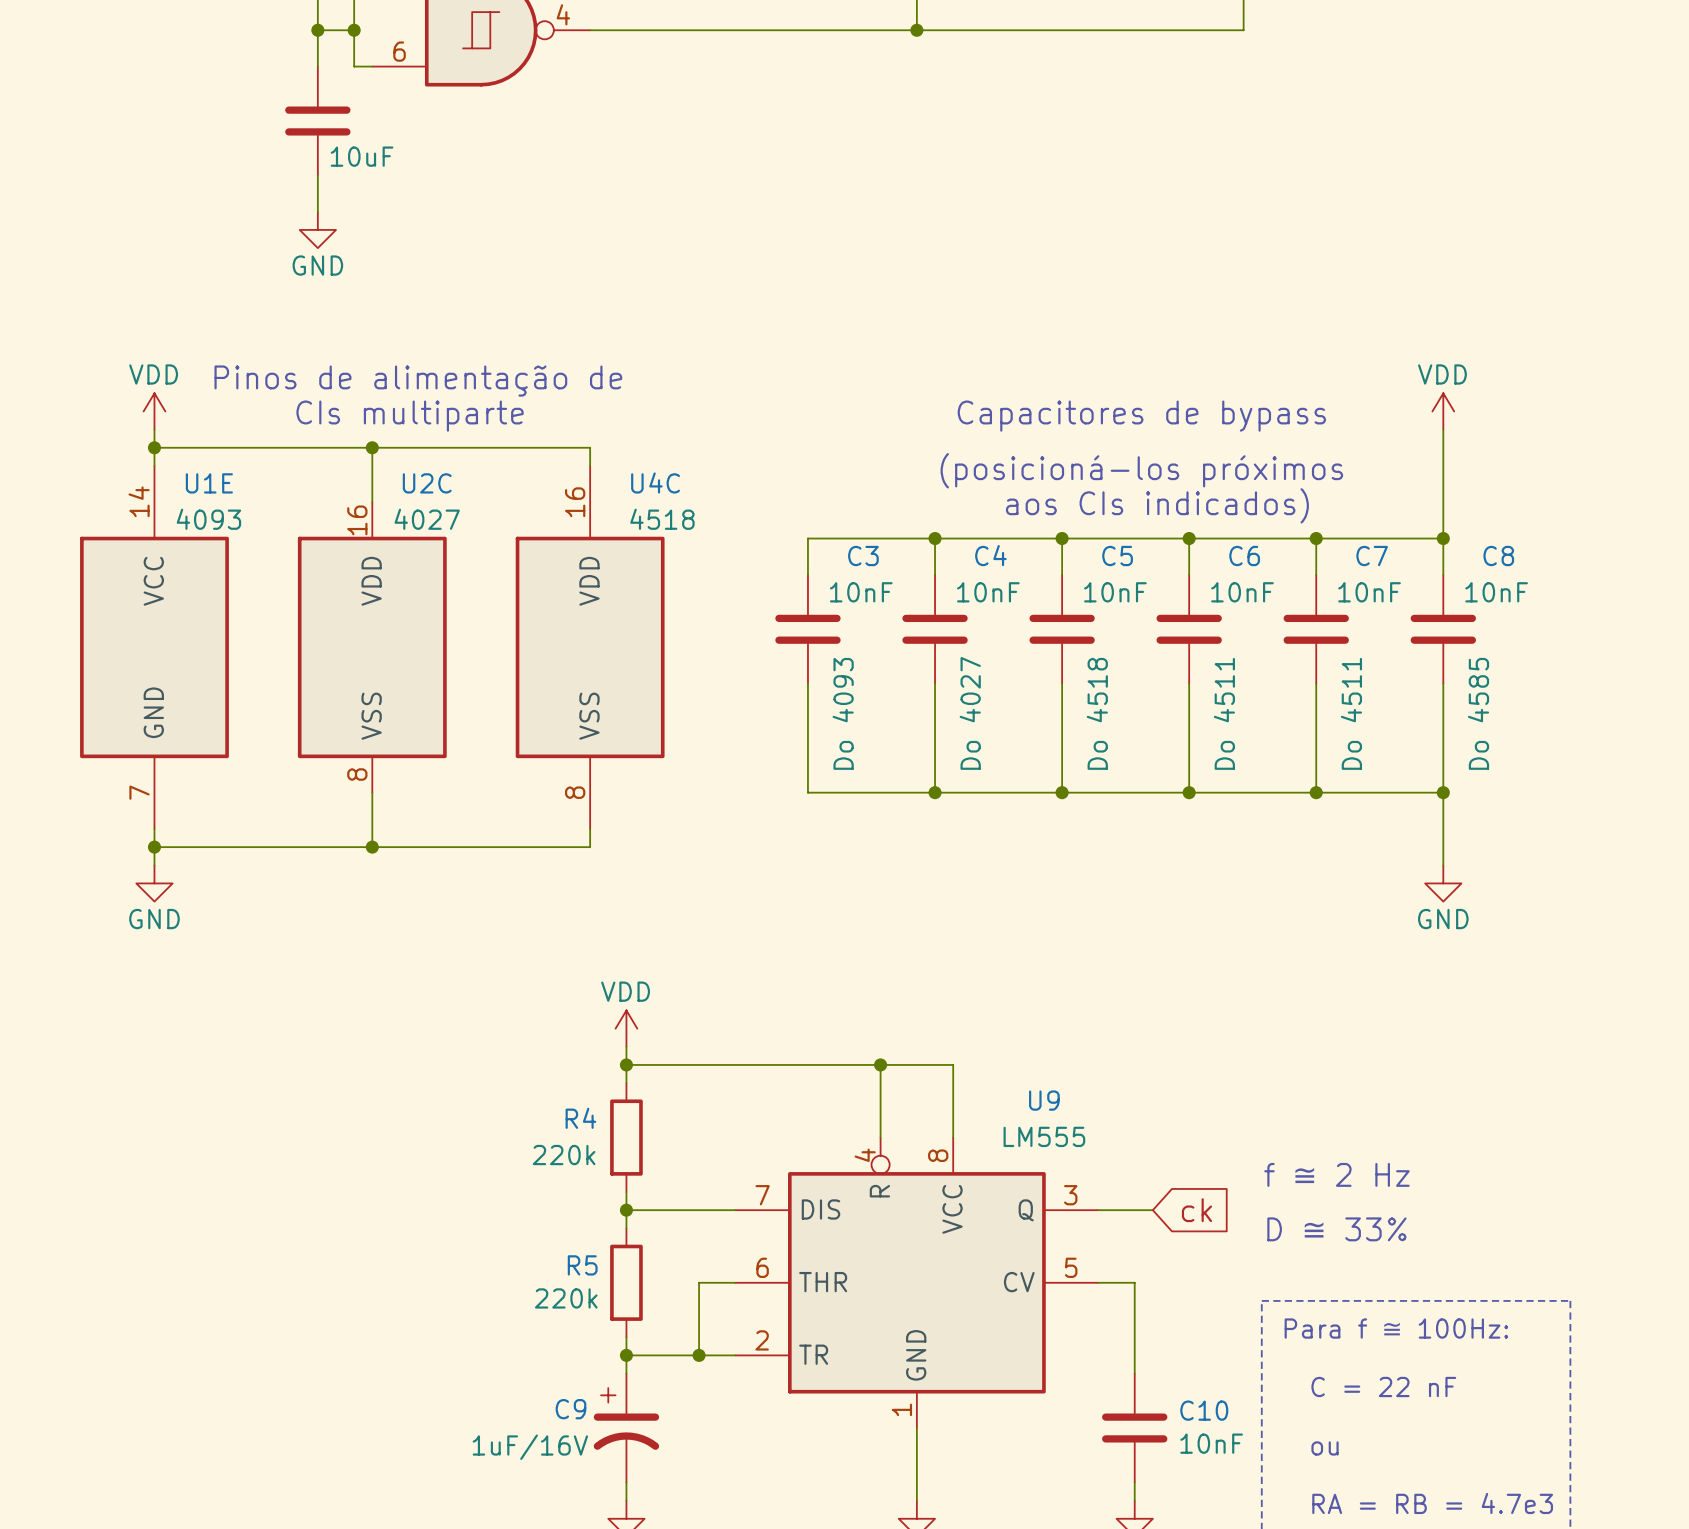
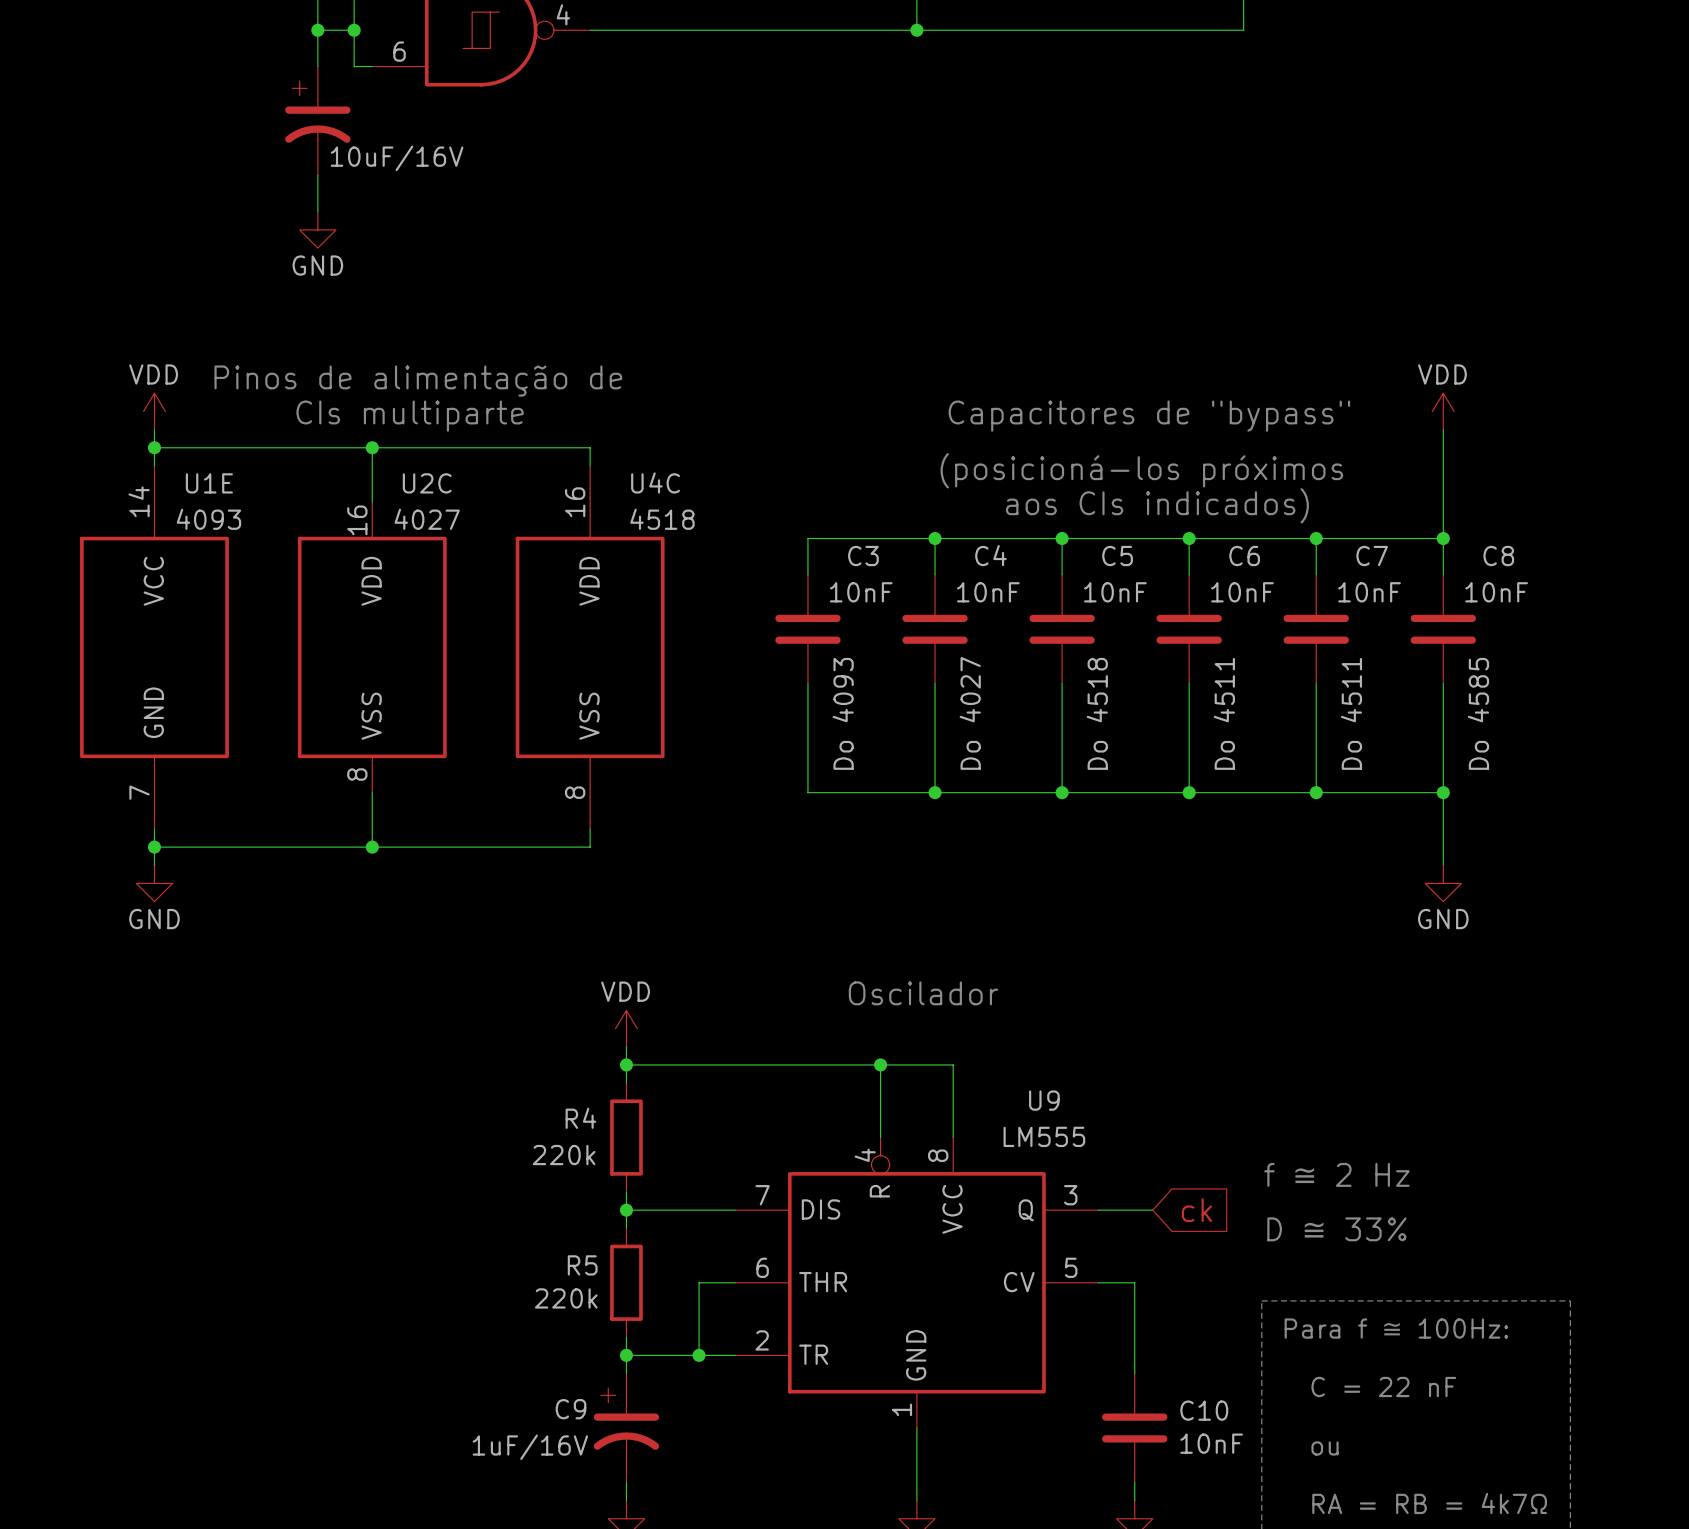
part symbol: [285, 66, 351, 176] -> [285, 66, 351, 176]
part value: 10uF (362, 156) -> 10uF/16V (397, 158)
text: Capacitores de bypass (1141, 416) -> Capacitores de "bypass" (1149, 416)
text: none -> Oscilador (923, 993)
text: RA = RB = 4.7e3 (1432, 1503) -> RA = RB = 4k7Ω (1429, 1503)

